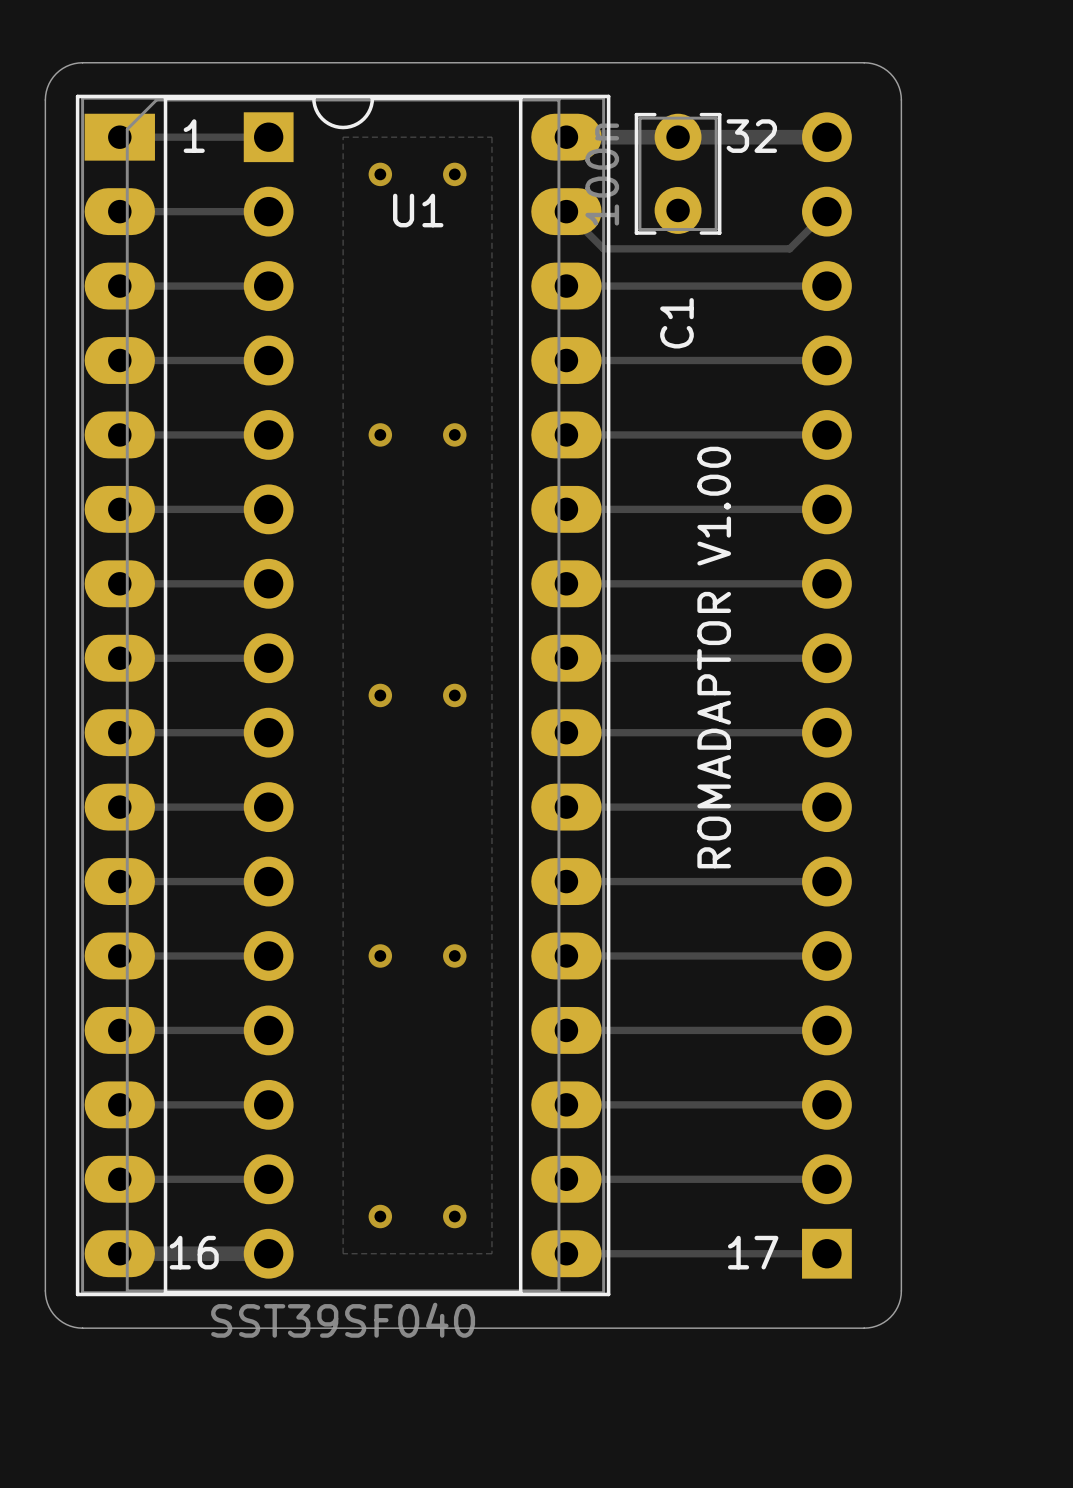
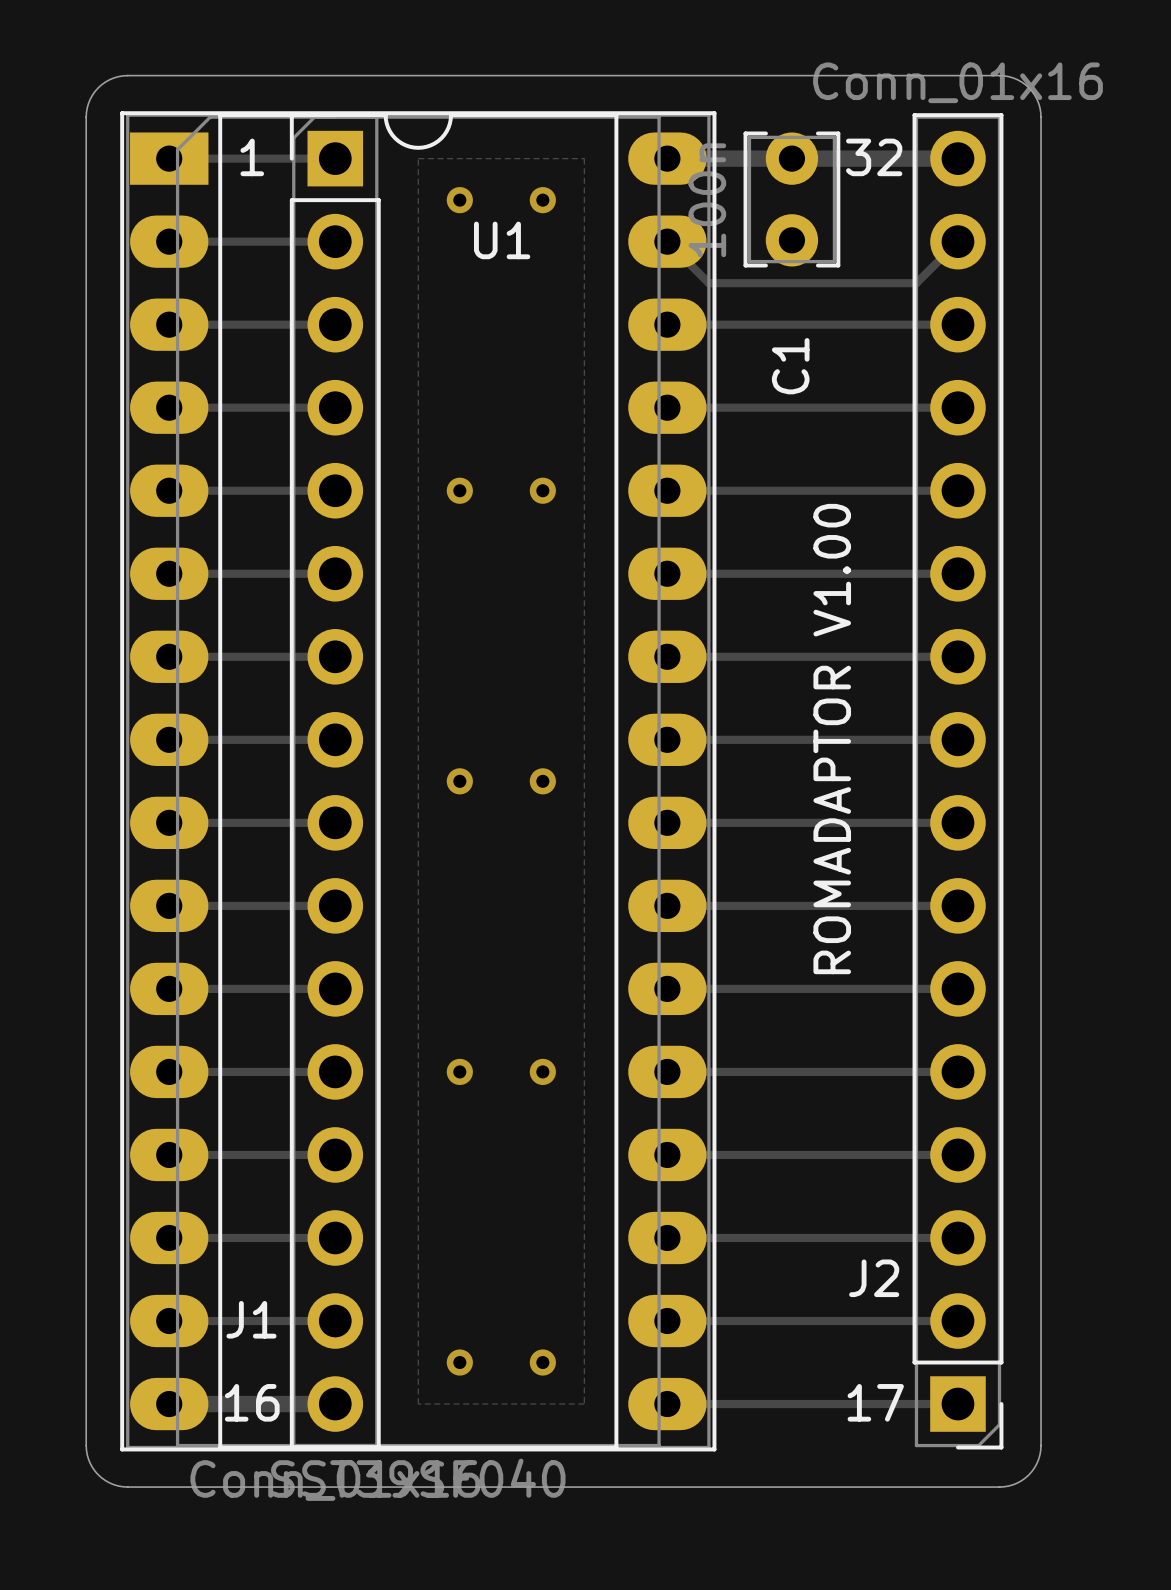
J1 side: bottom (268, 695) -> top (335, 781)
J2 side: bottom (826, 695) -> top (957, 781)

